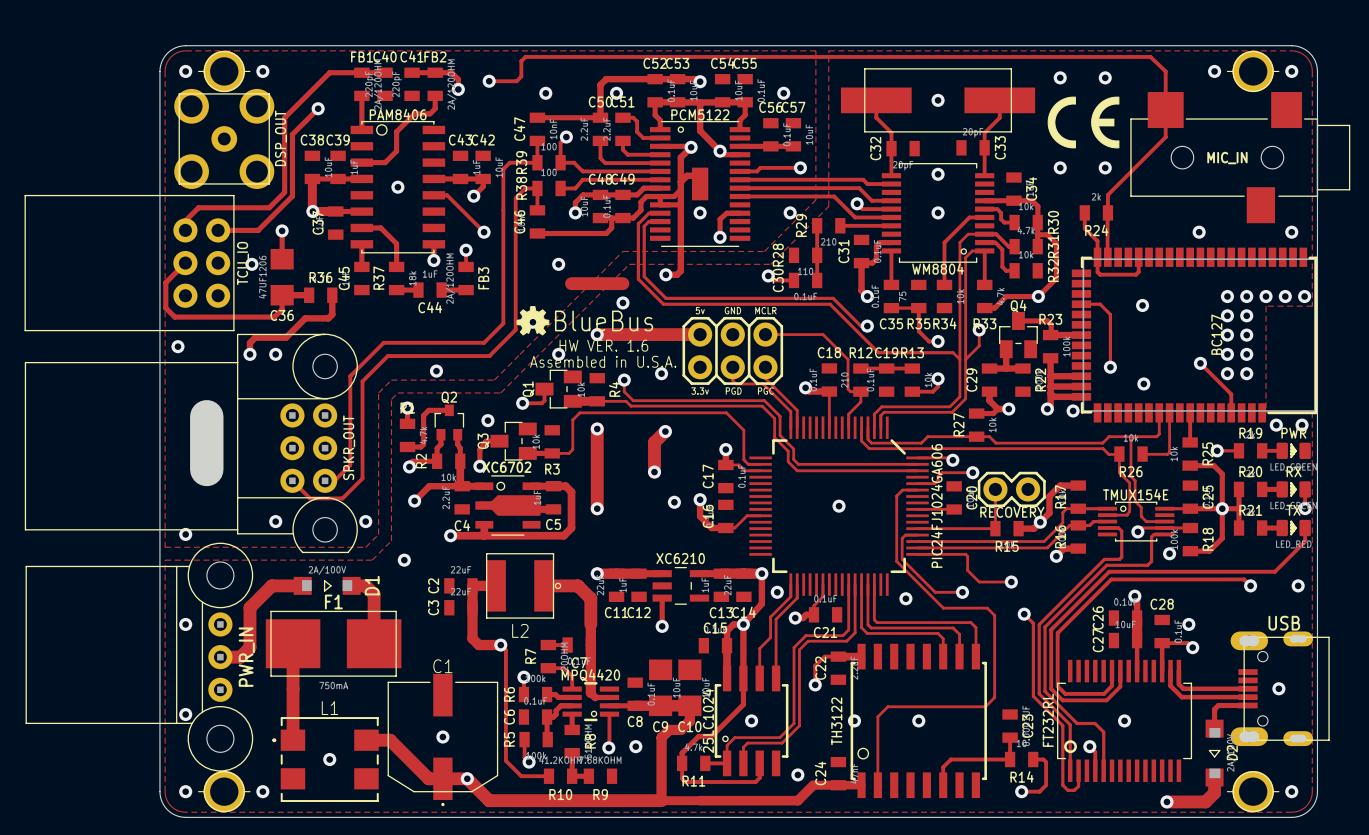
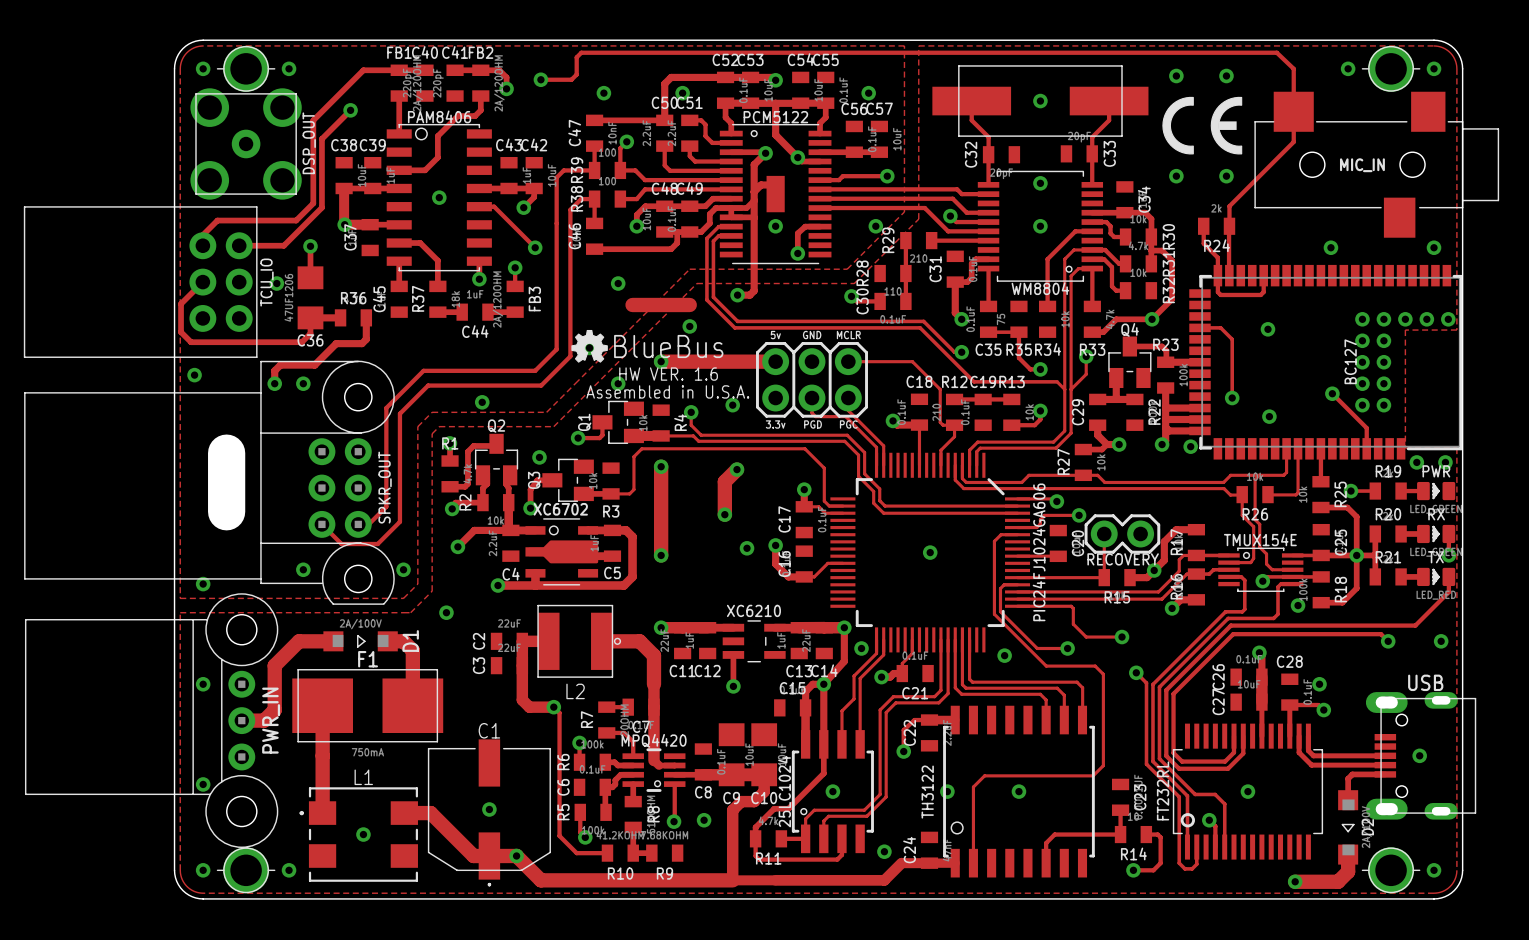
Q2 footprint: [434, 404, 465, 441] -> [474, 433, 519, 486]

